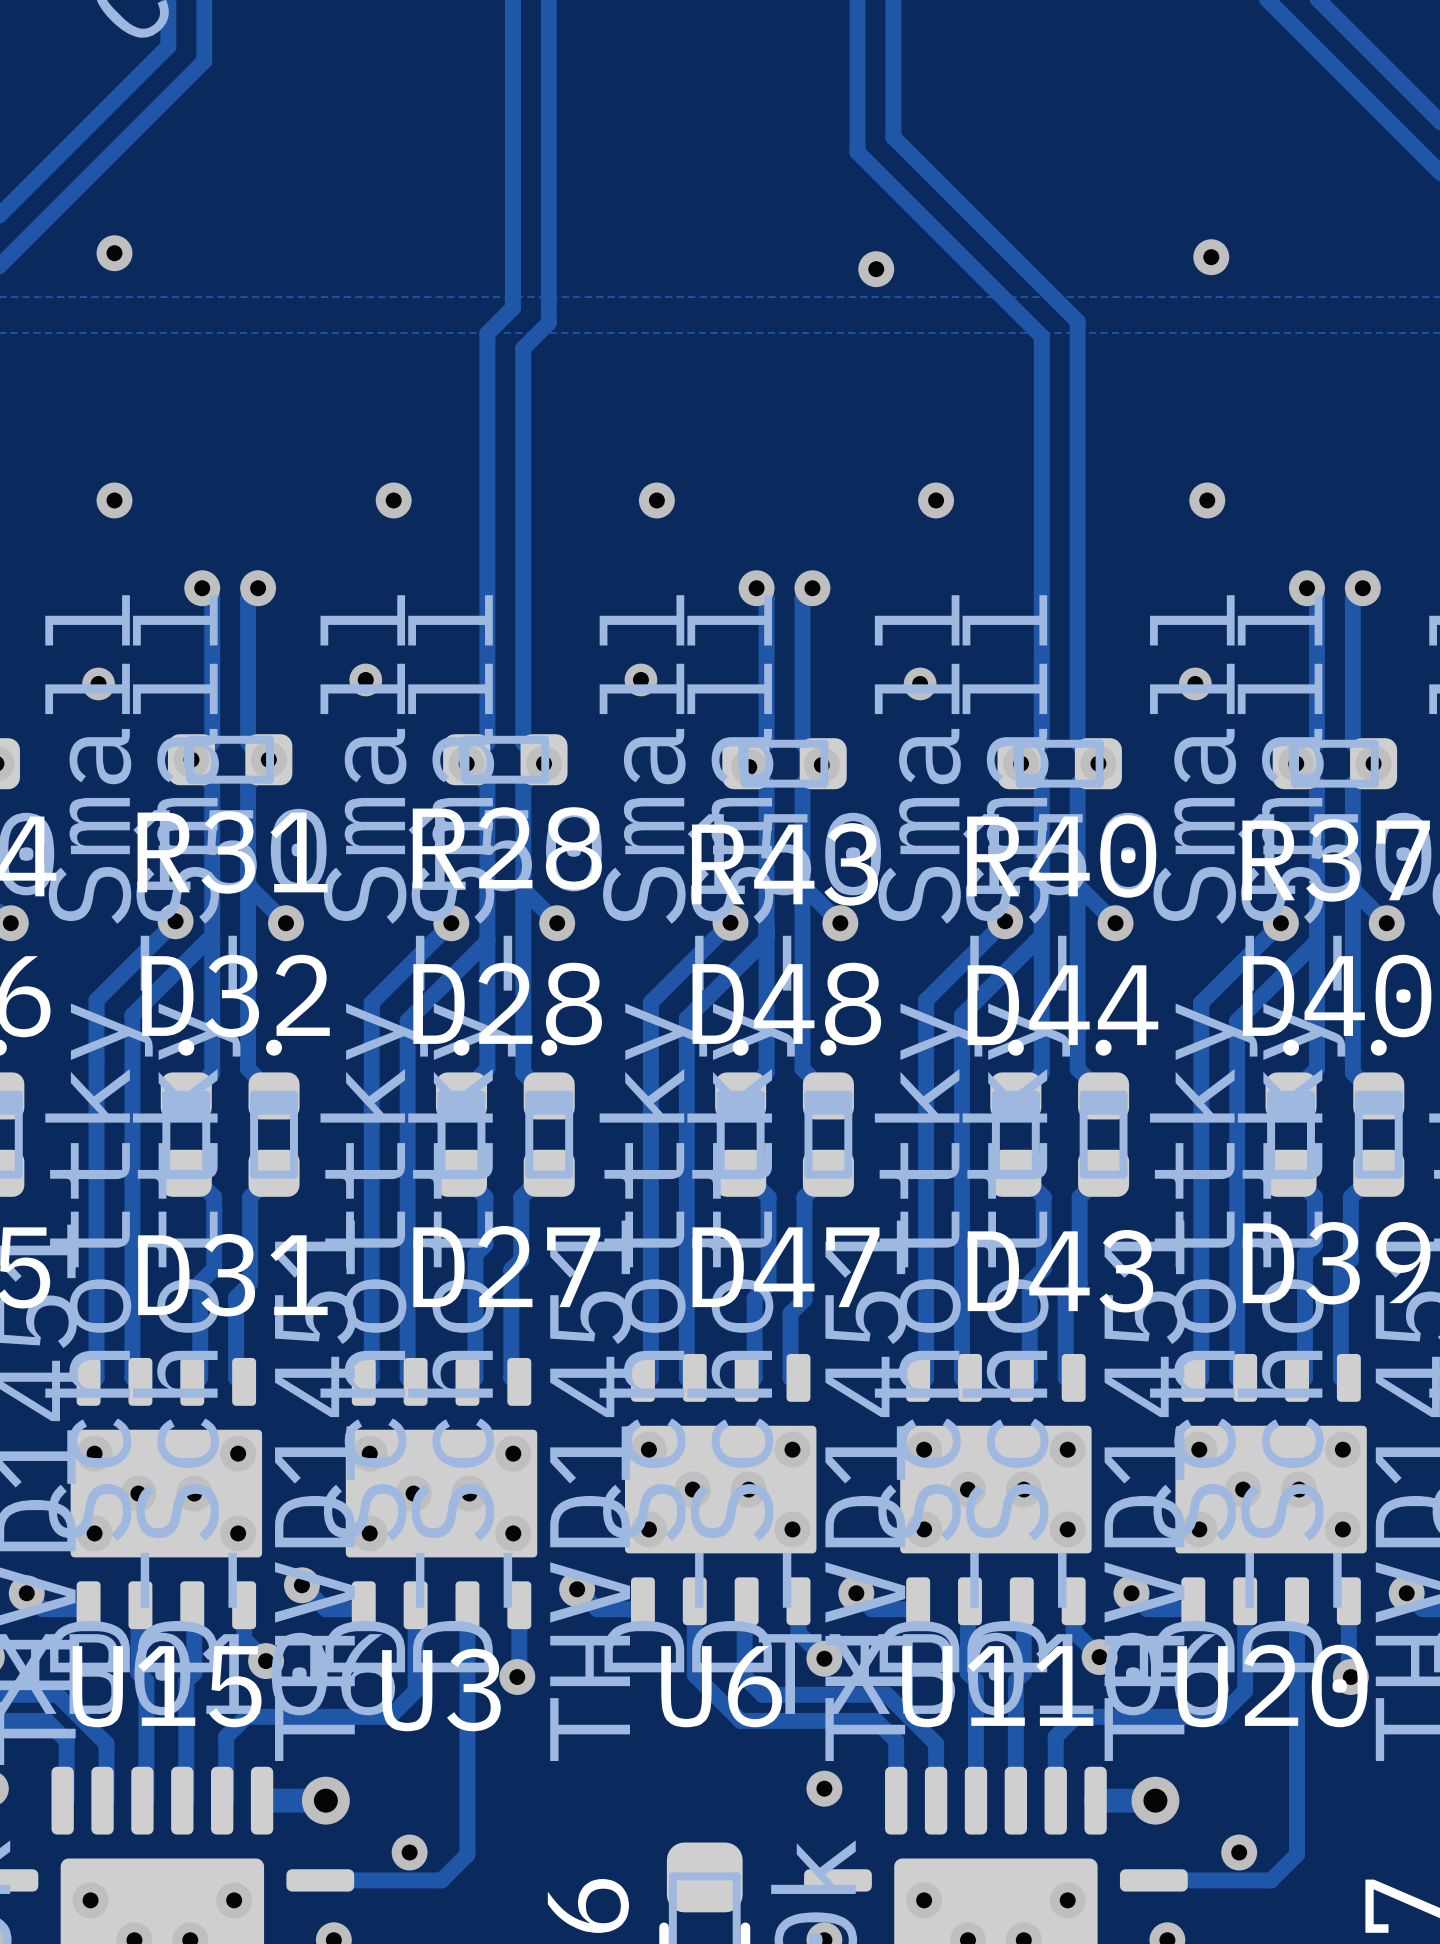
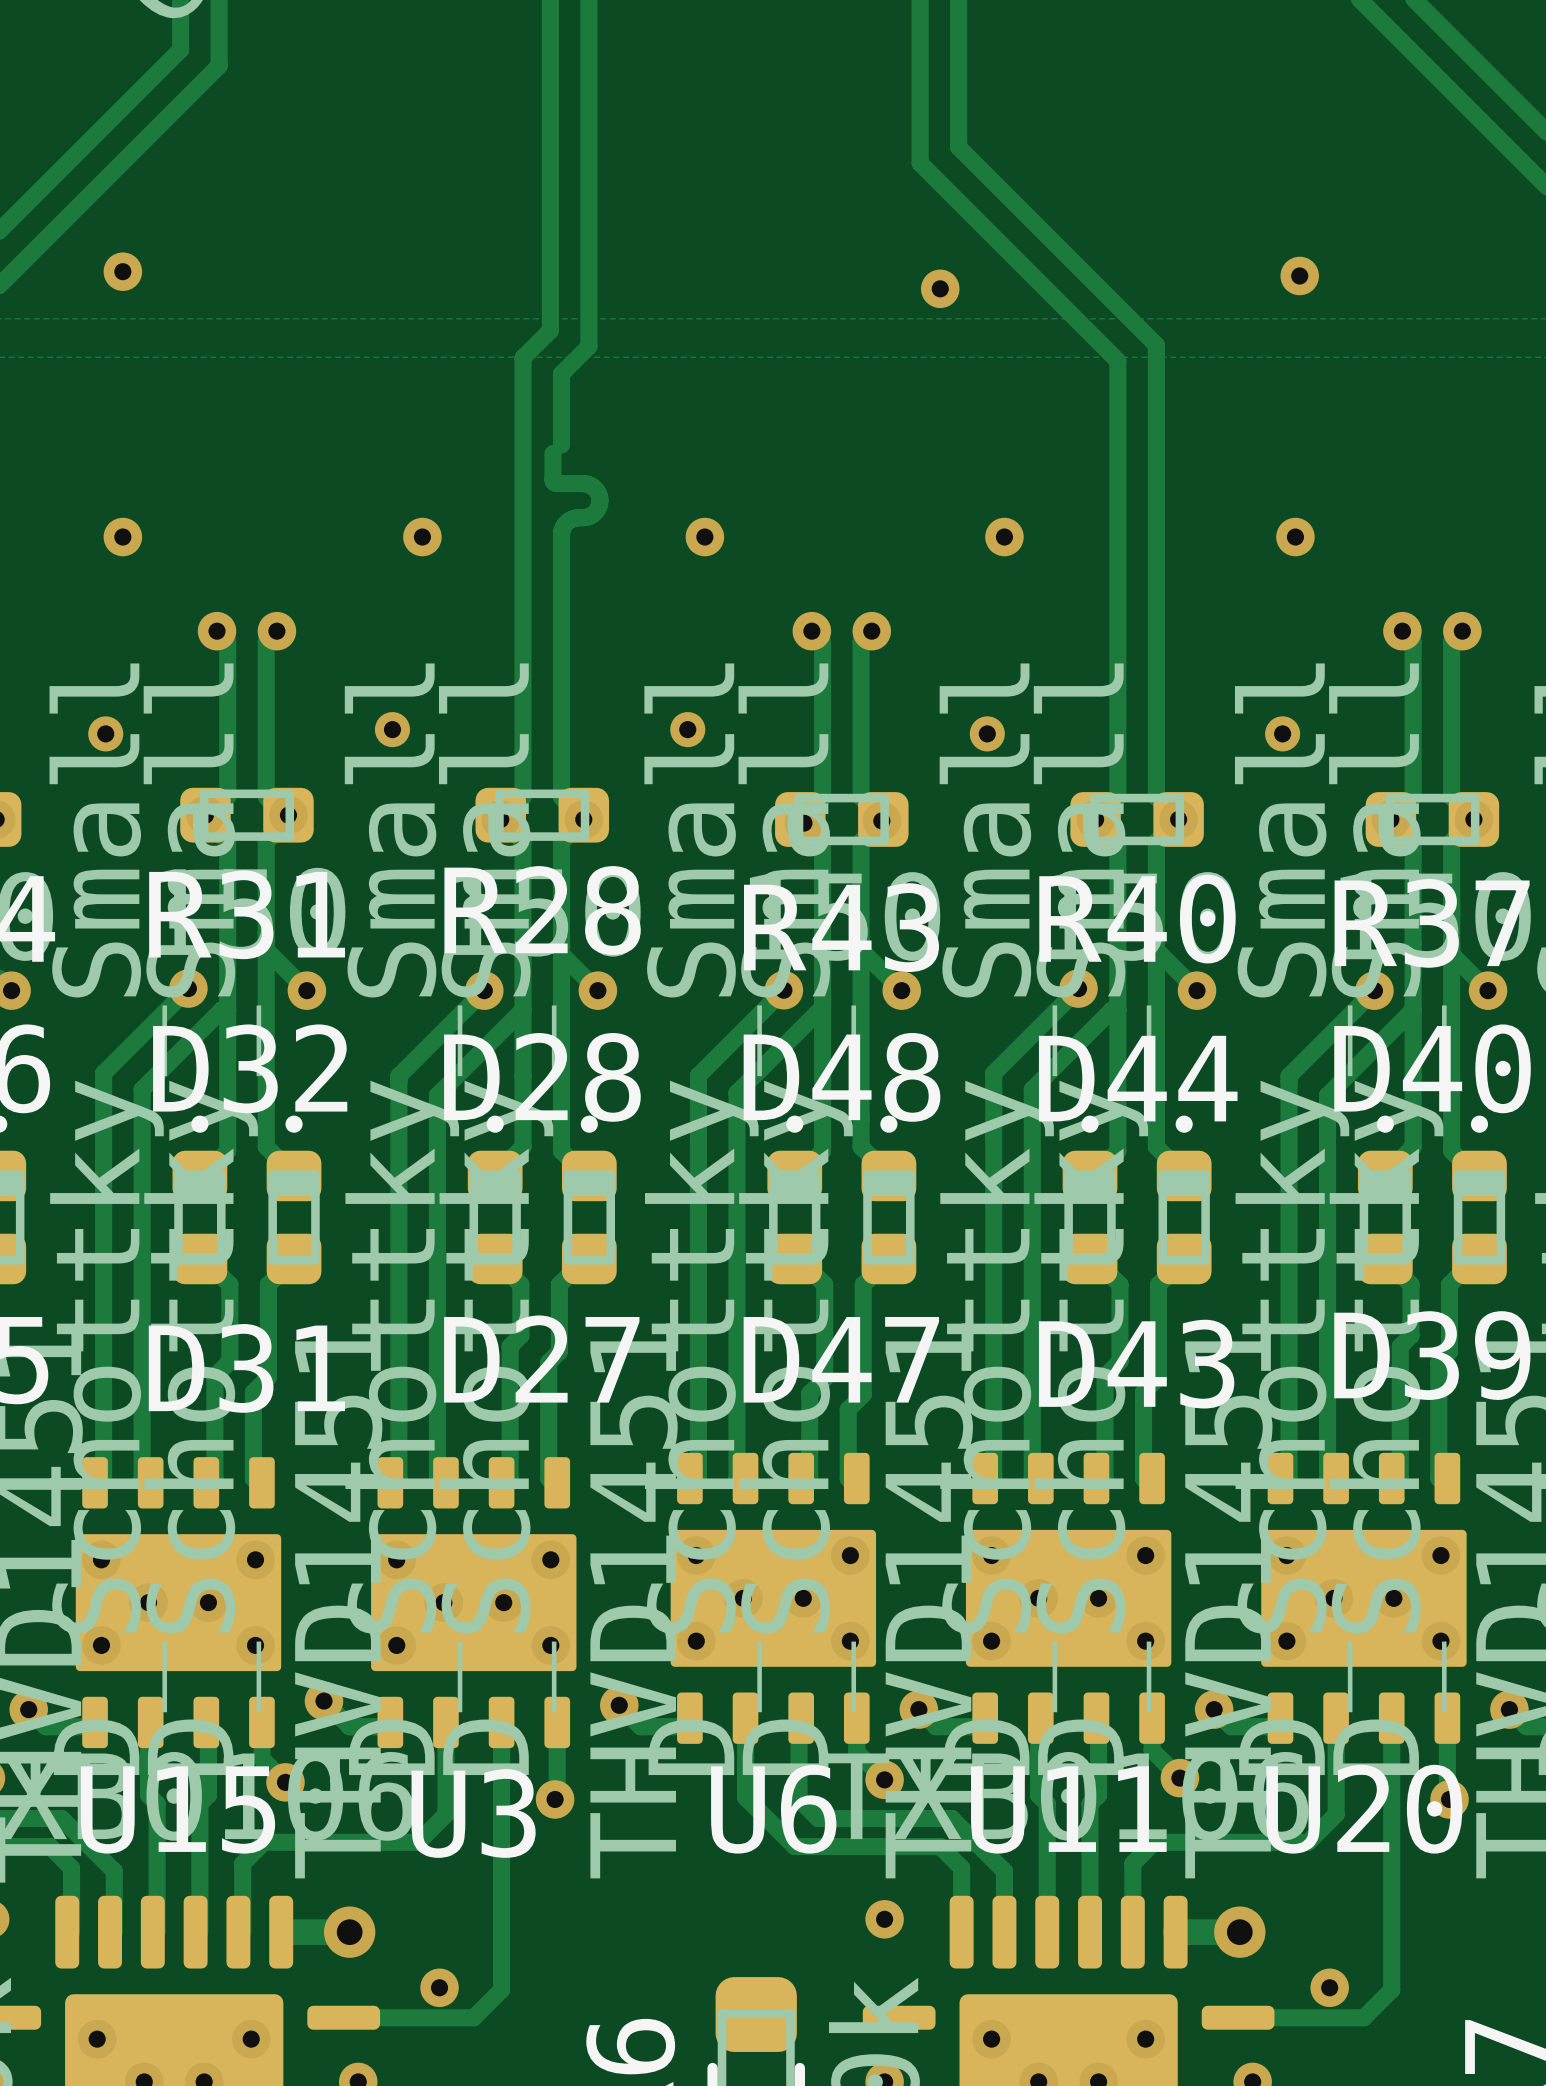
track: (523, 414) (523, 498) -> (557, 483) (590, 485) (596, 489) (600, 500) (598, 508) (593, 514) (567, 521) (563, 527) (561, 534)
track: none -> (552, 453) (552, 479)

